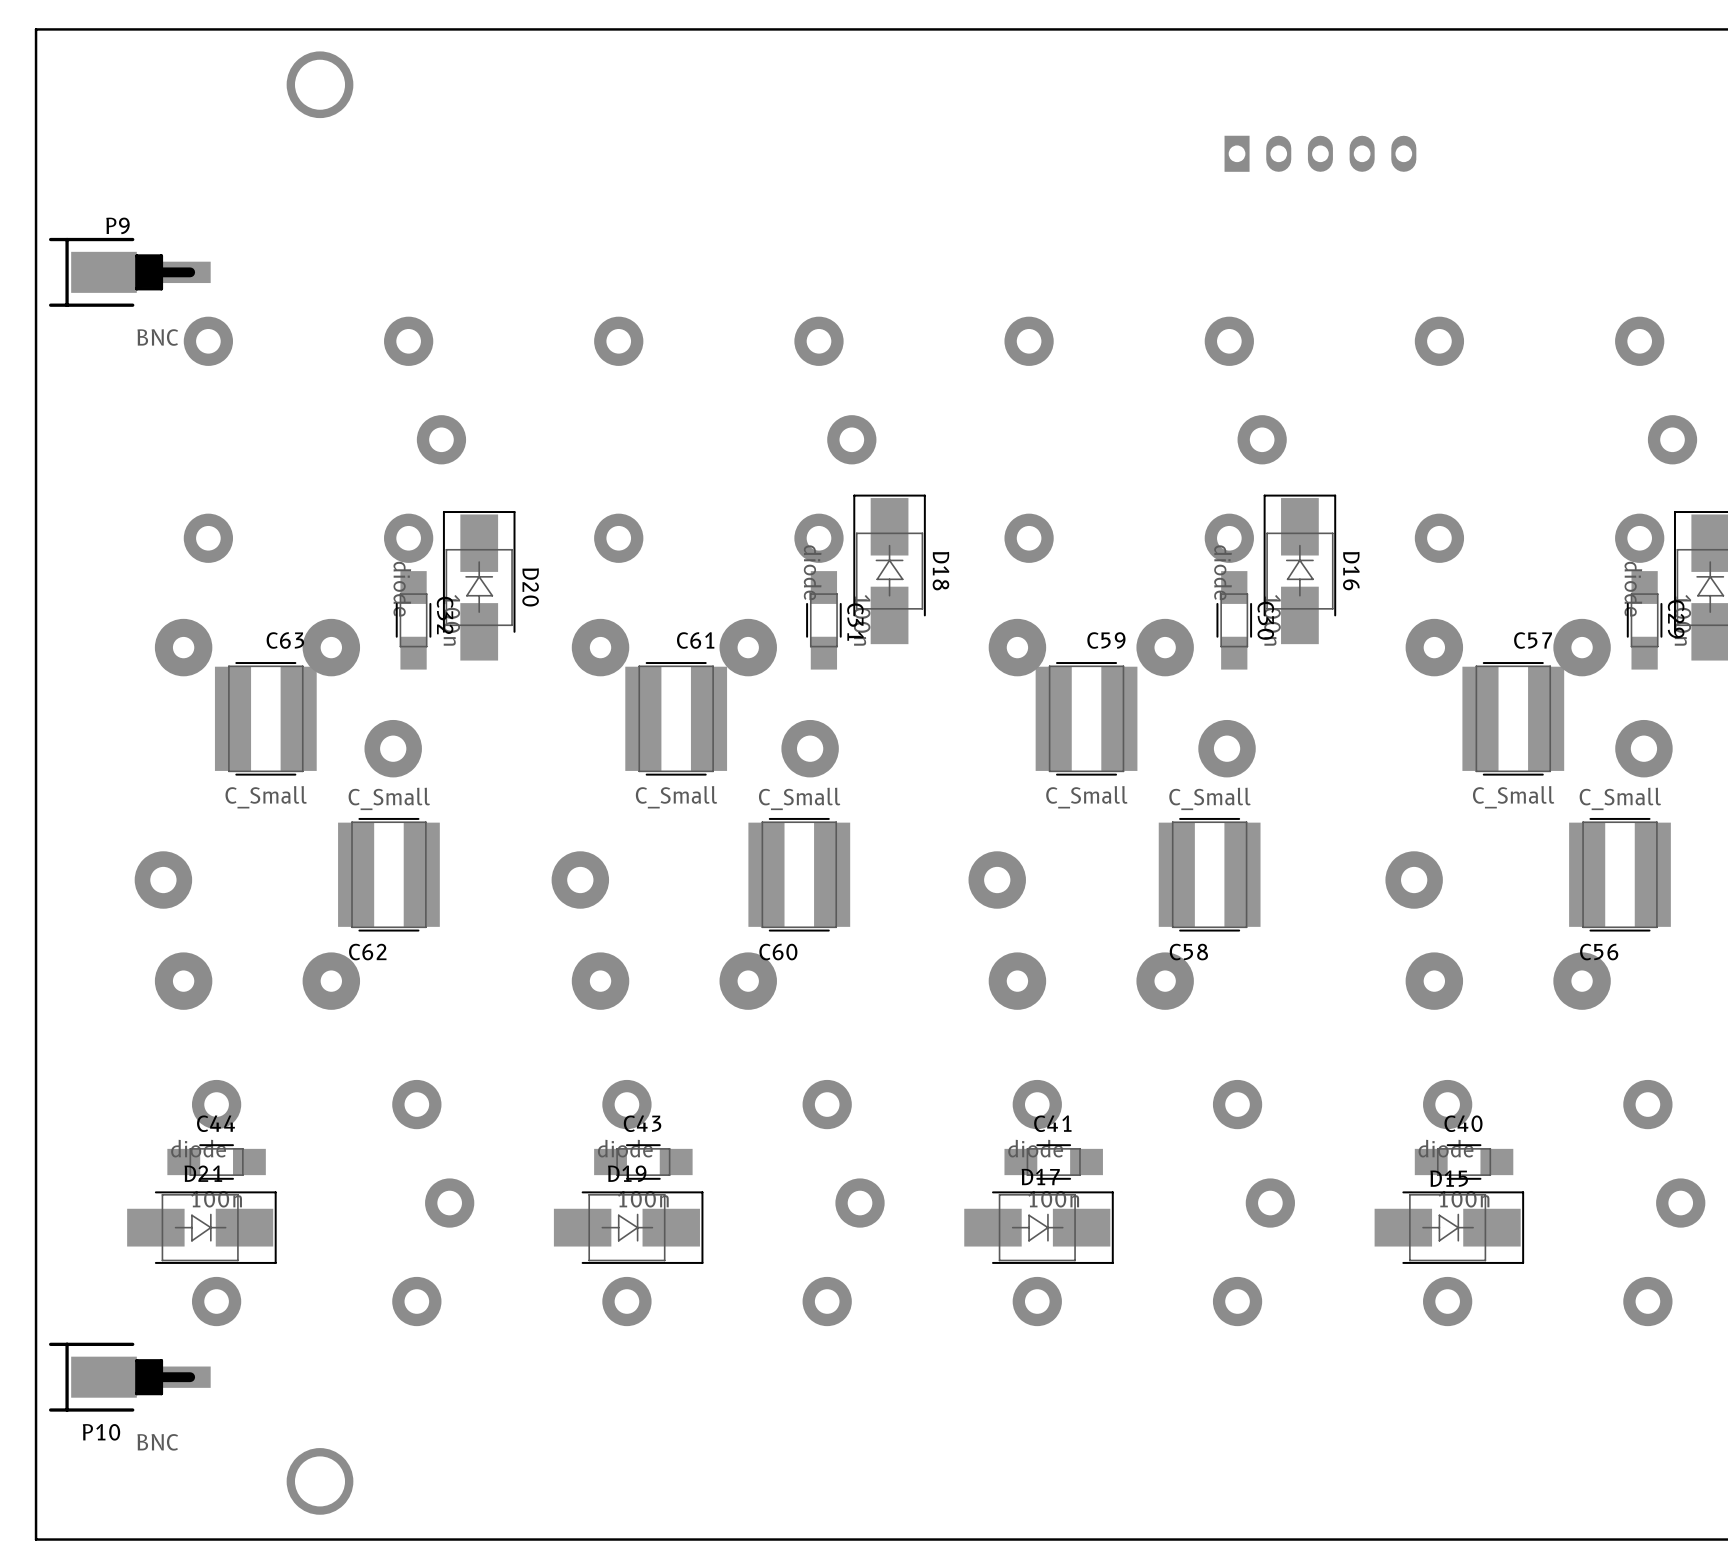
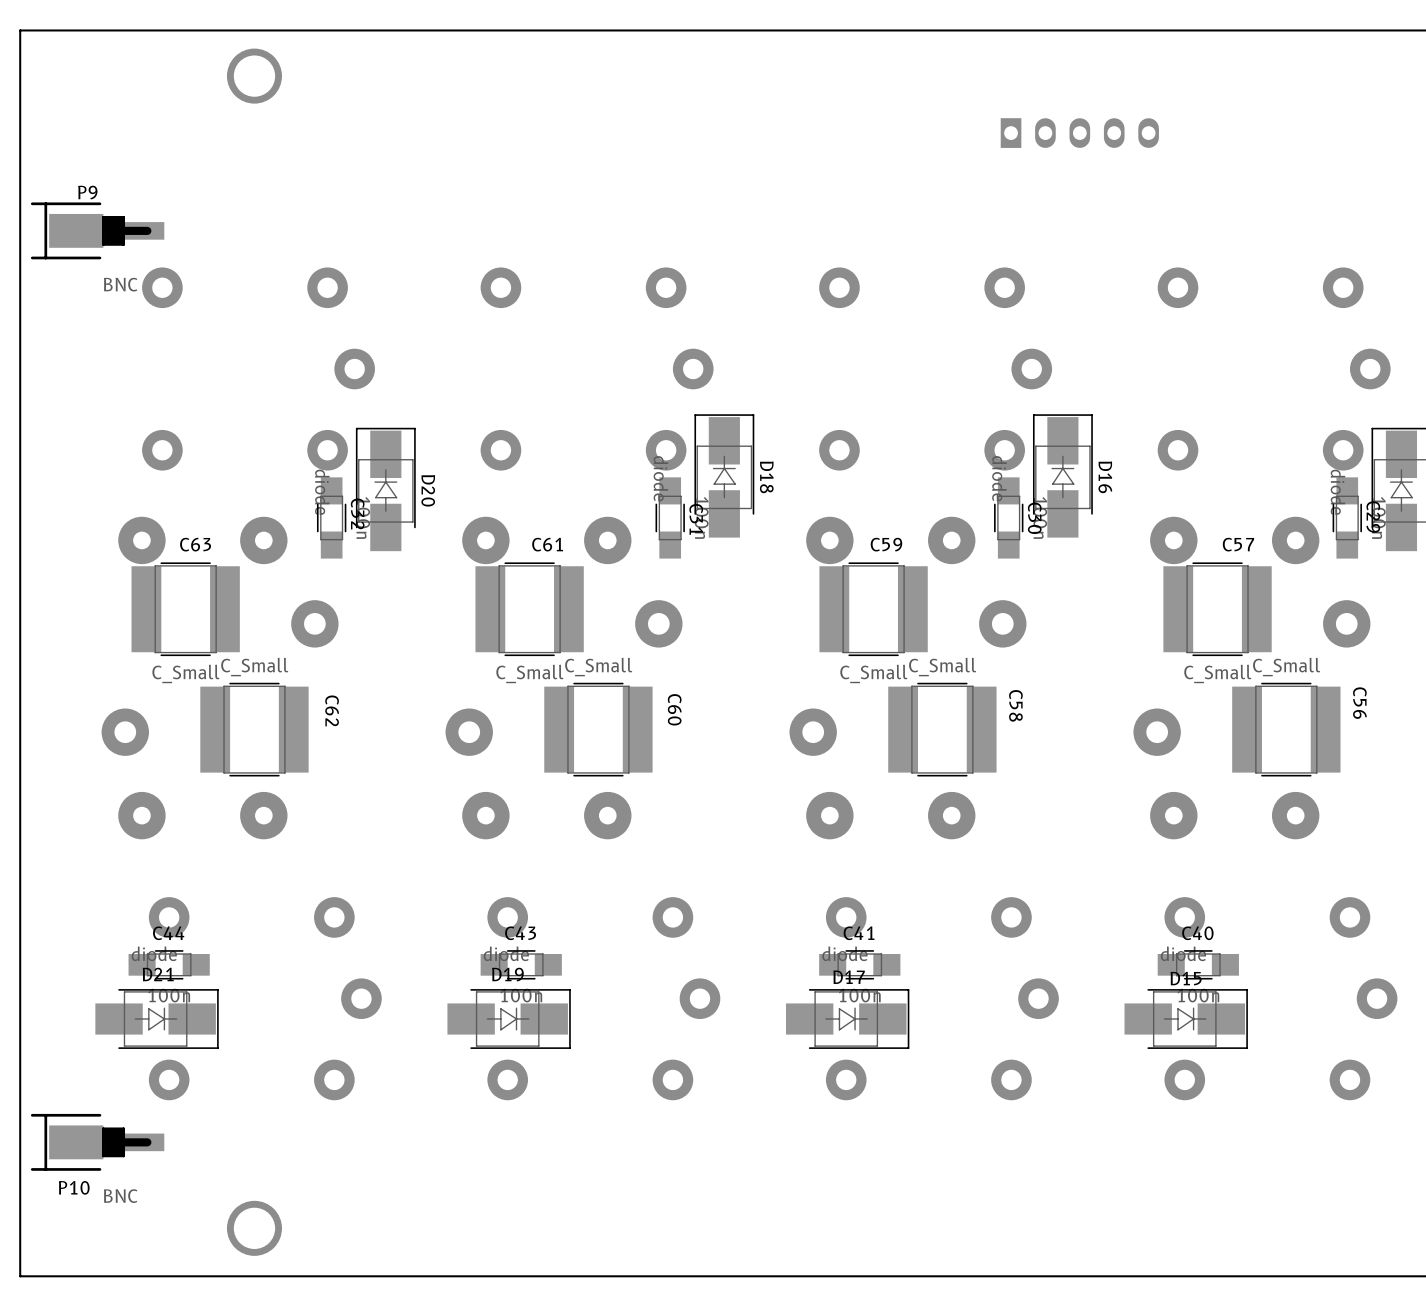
C63 footprint: [214, 662, 317, 776] -> [131, 562, 240, 657]
C61 footprint: [625, 662, 728, 776] -> [475, 562, 584, 657]
C59 footprint: [1035, 662, 1138, 776] -> [819, 562, 928, 657]
C57 footprint: [1462, 662, 1565, 776] -> [1163, 562, 1272, 657]
C62 footprint: [338, 817, 440, 932] -> [200, 682, 309, 777]
C60 footprint: [748, 817, 851, 932] -> [544, 682, 653, 777]
C58 footprint: [1158, 817, 1261, 932] -> [888, 682, 997, 777]
C56 footprint: [1569, 817, 1671, 932] -> [1232, 682, 1341, 777]
C62 name position: C62 (367, 952) -> C62 (332, 710)
C60 name position: C60 (778, 952) -> C60 (674, 709)
C58 name position: C58 (1188, 952) -> C58 (1015, 705)
C56 name position: C56 (1599, 952) -> C56 (1359, 703)

